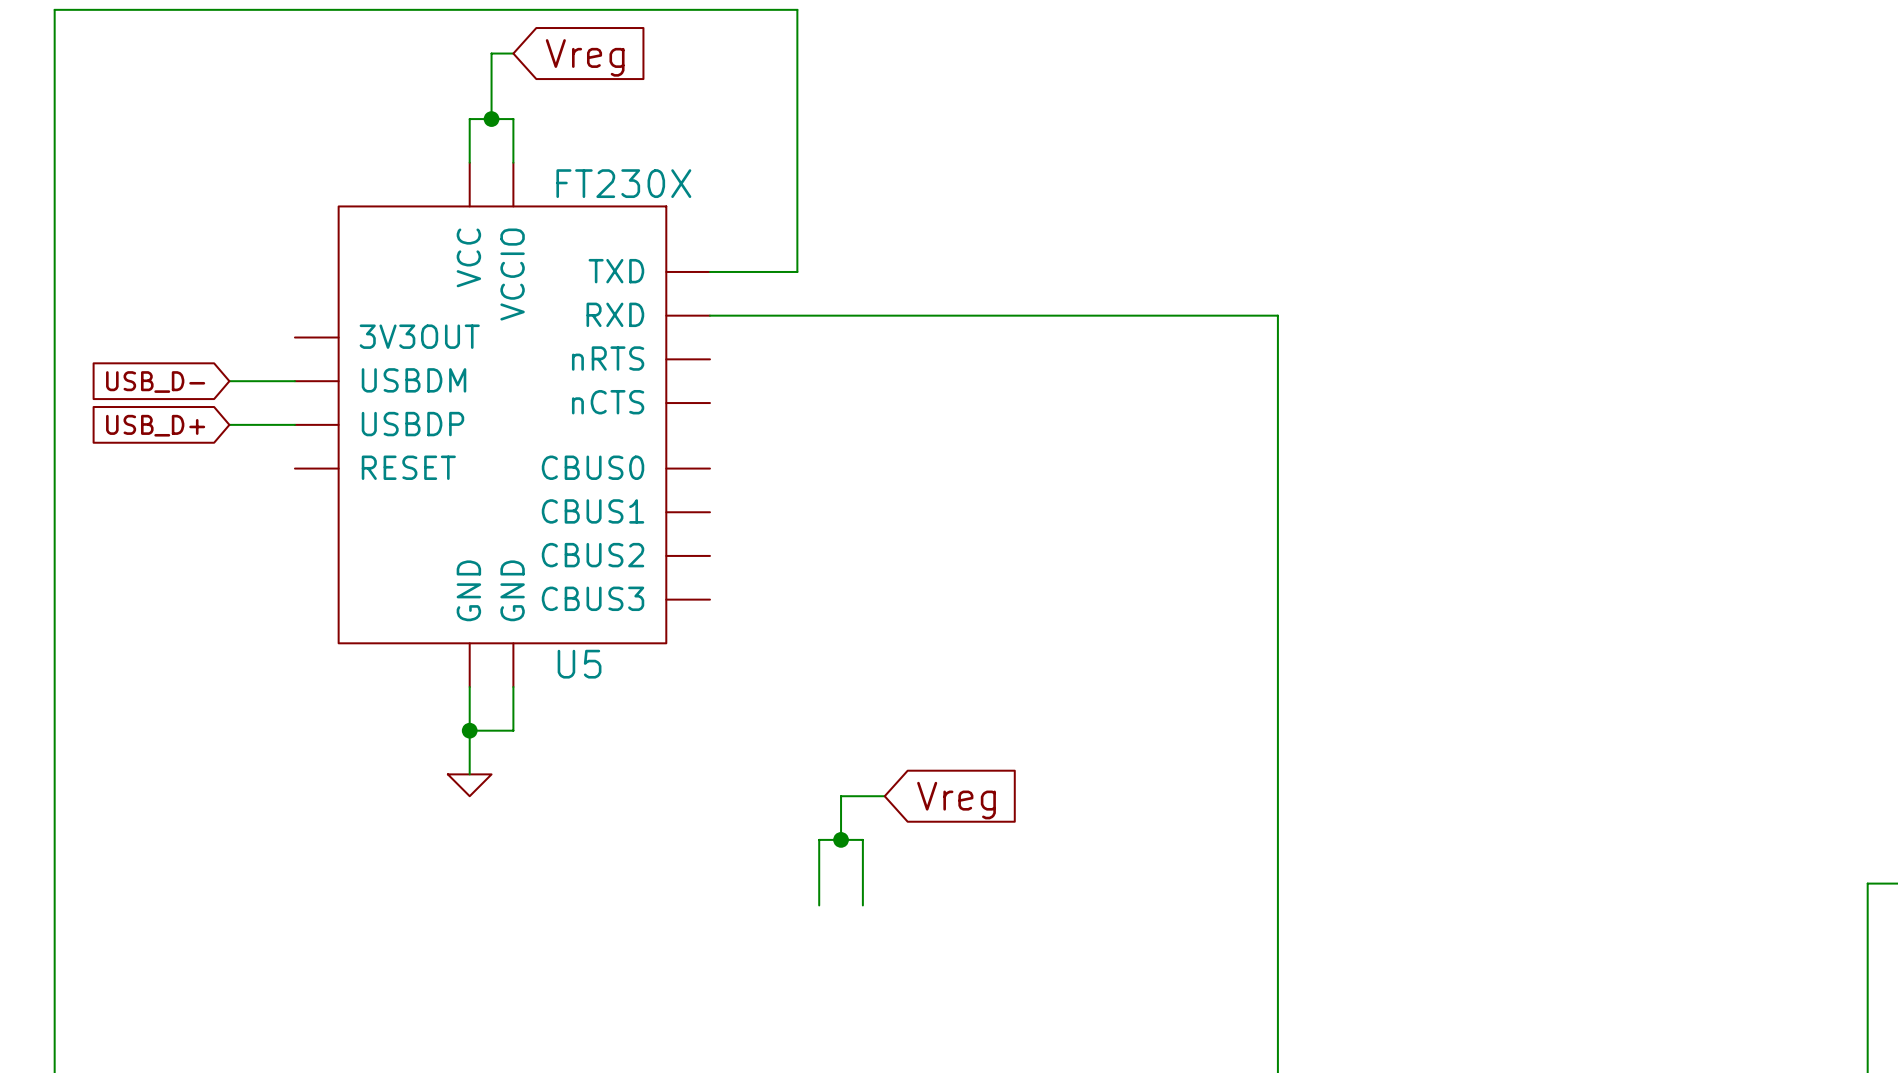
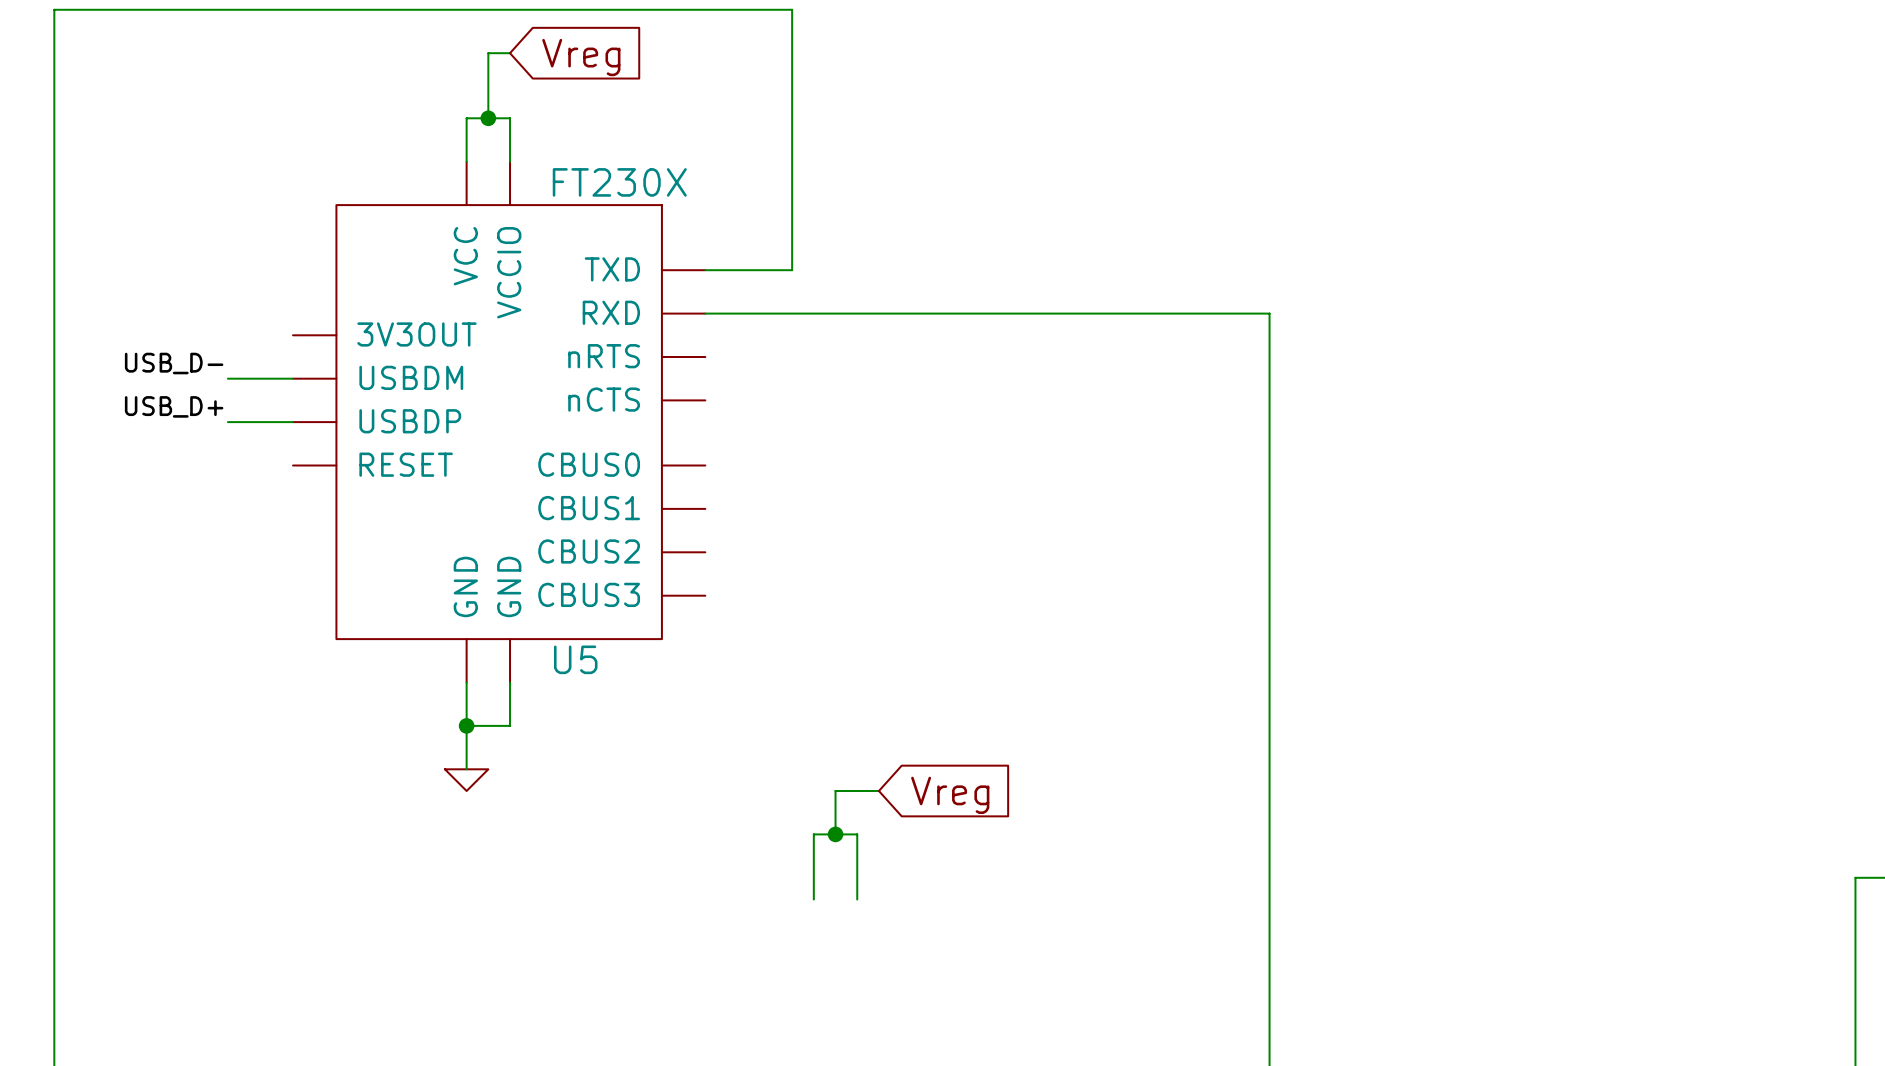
label: none -> USB_D- (174, 363)
global label: USB_D- (155, 382) -> none
label: none -> USB_D+ (174, 406)
global label: USB_D+ (155, 425) -> none

